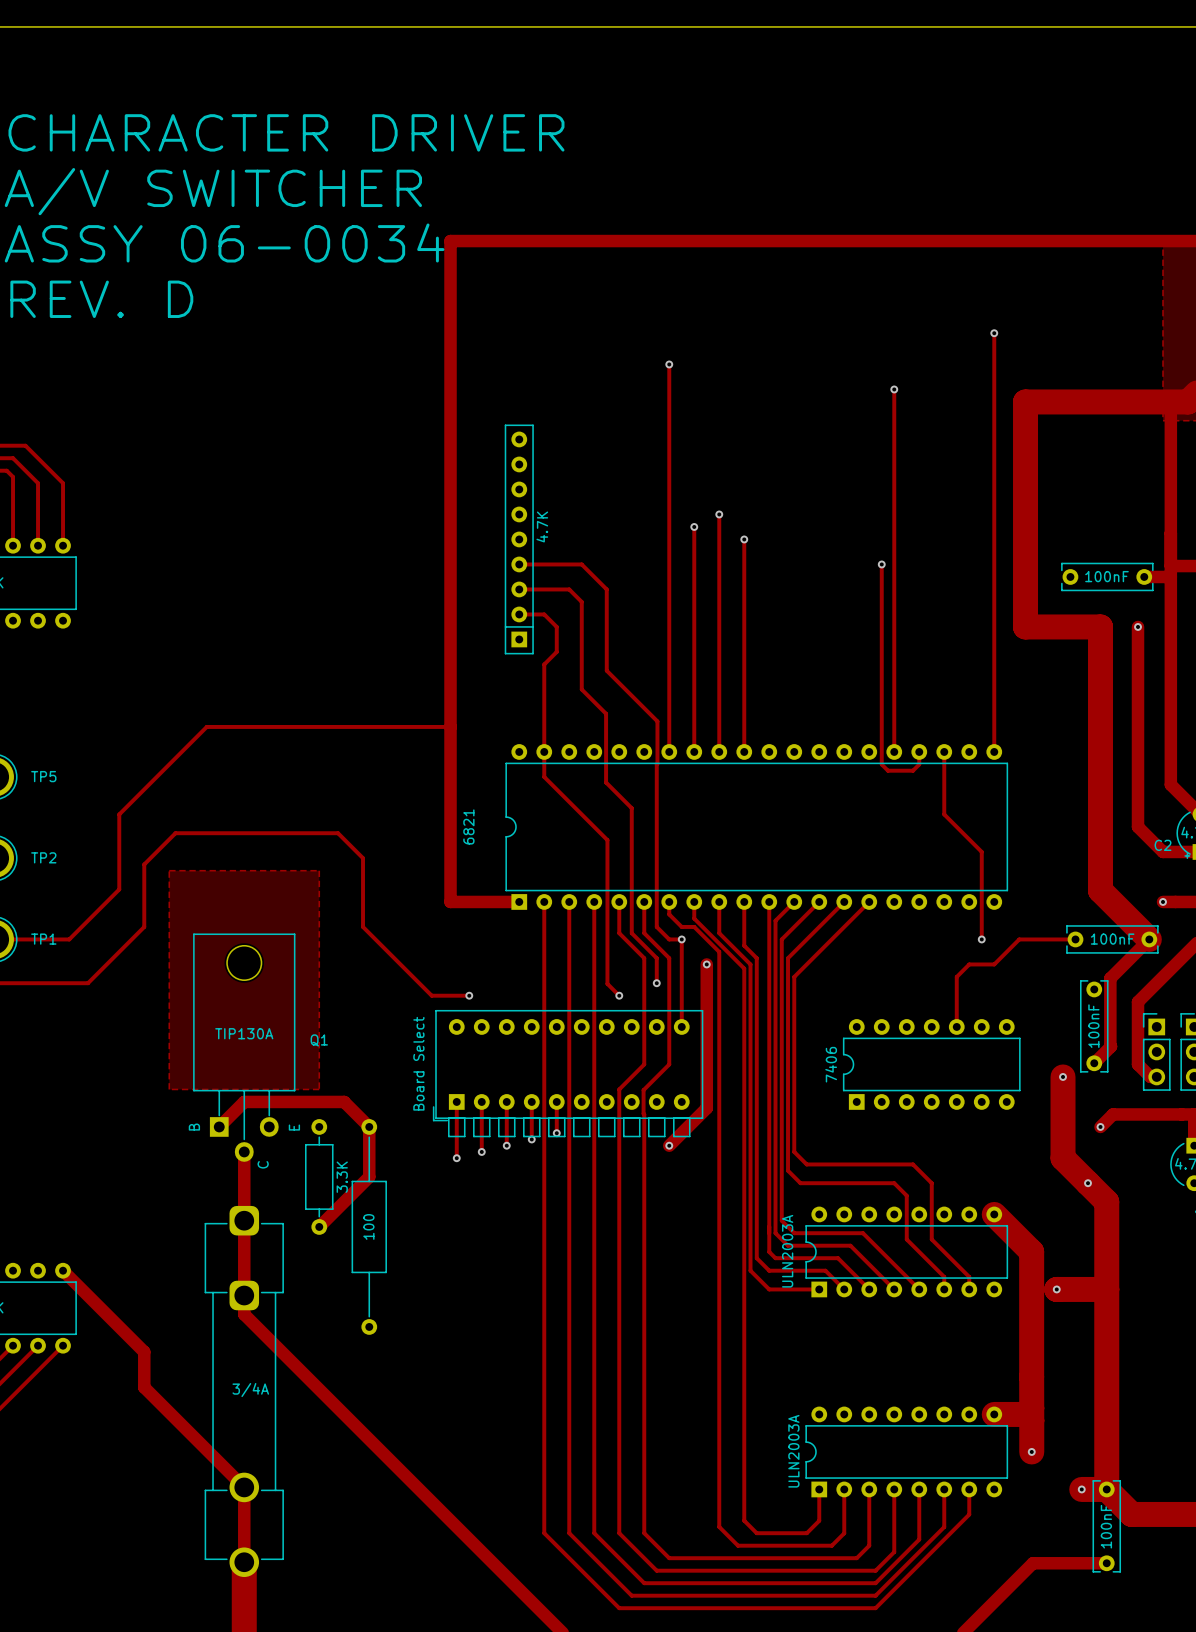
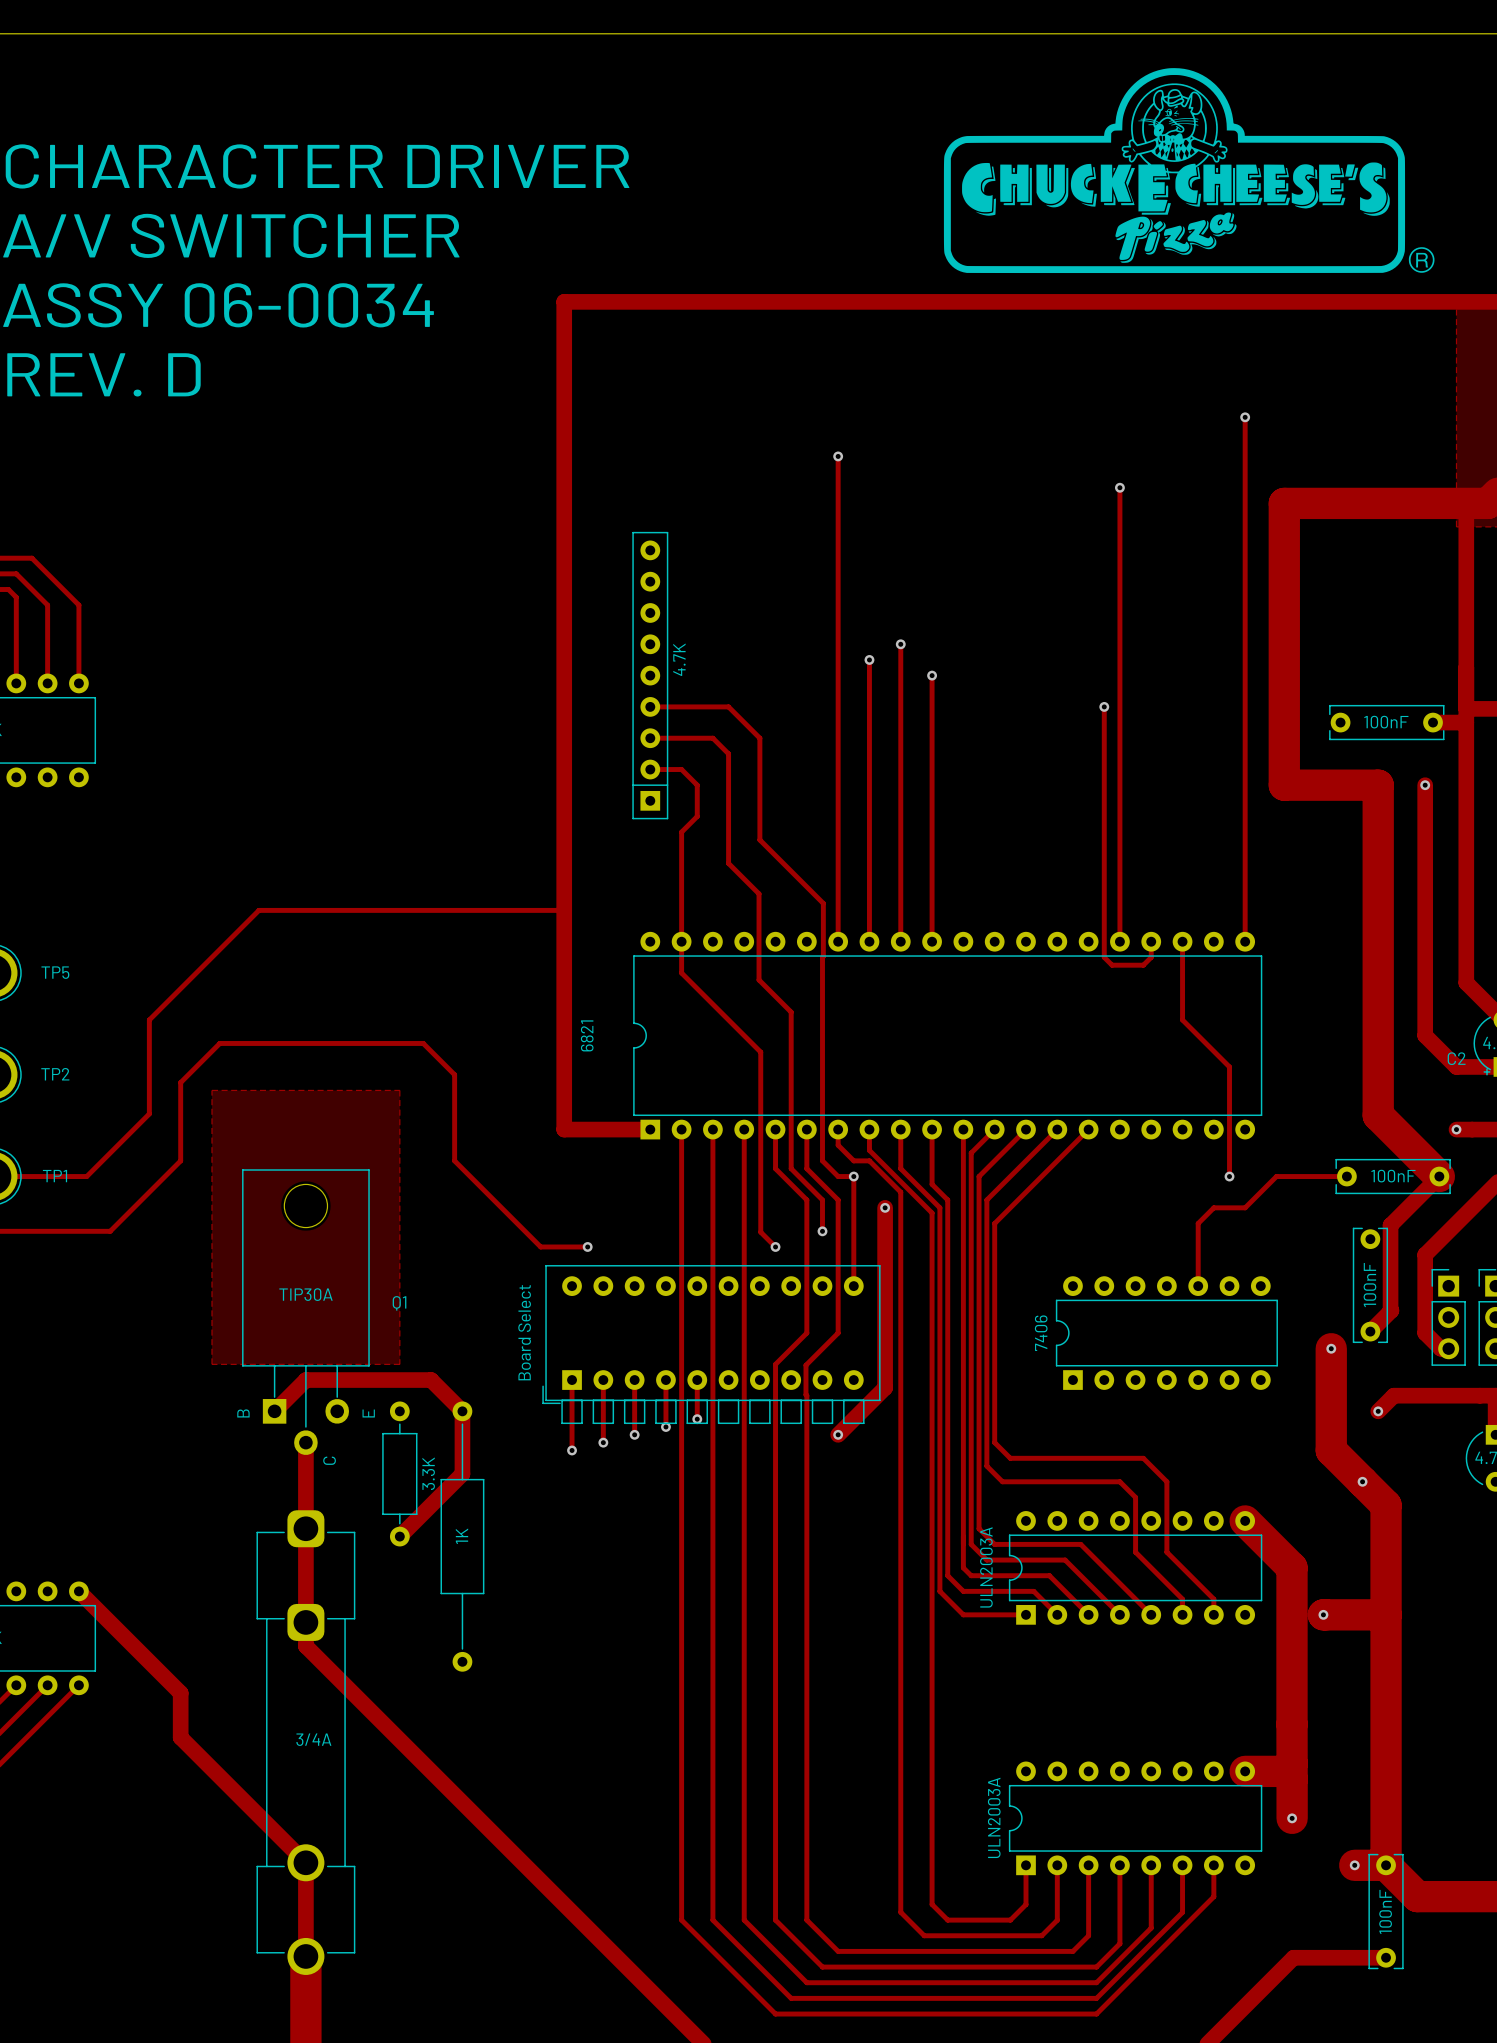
drawing: none -> [943, 68, 1435, 274]
Q1 value: TIP130A (244, 1033) -> TIP30A (305, 1294)
part value: 100 (368, 1226) -> 1K (461, 1536)

